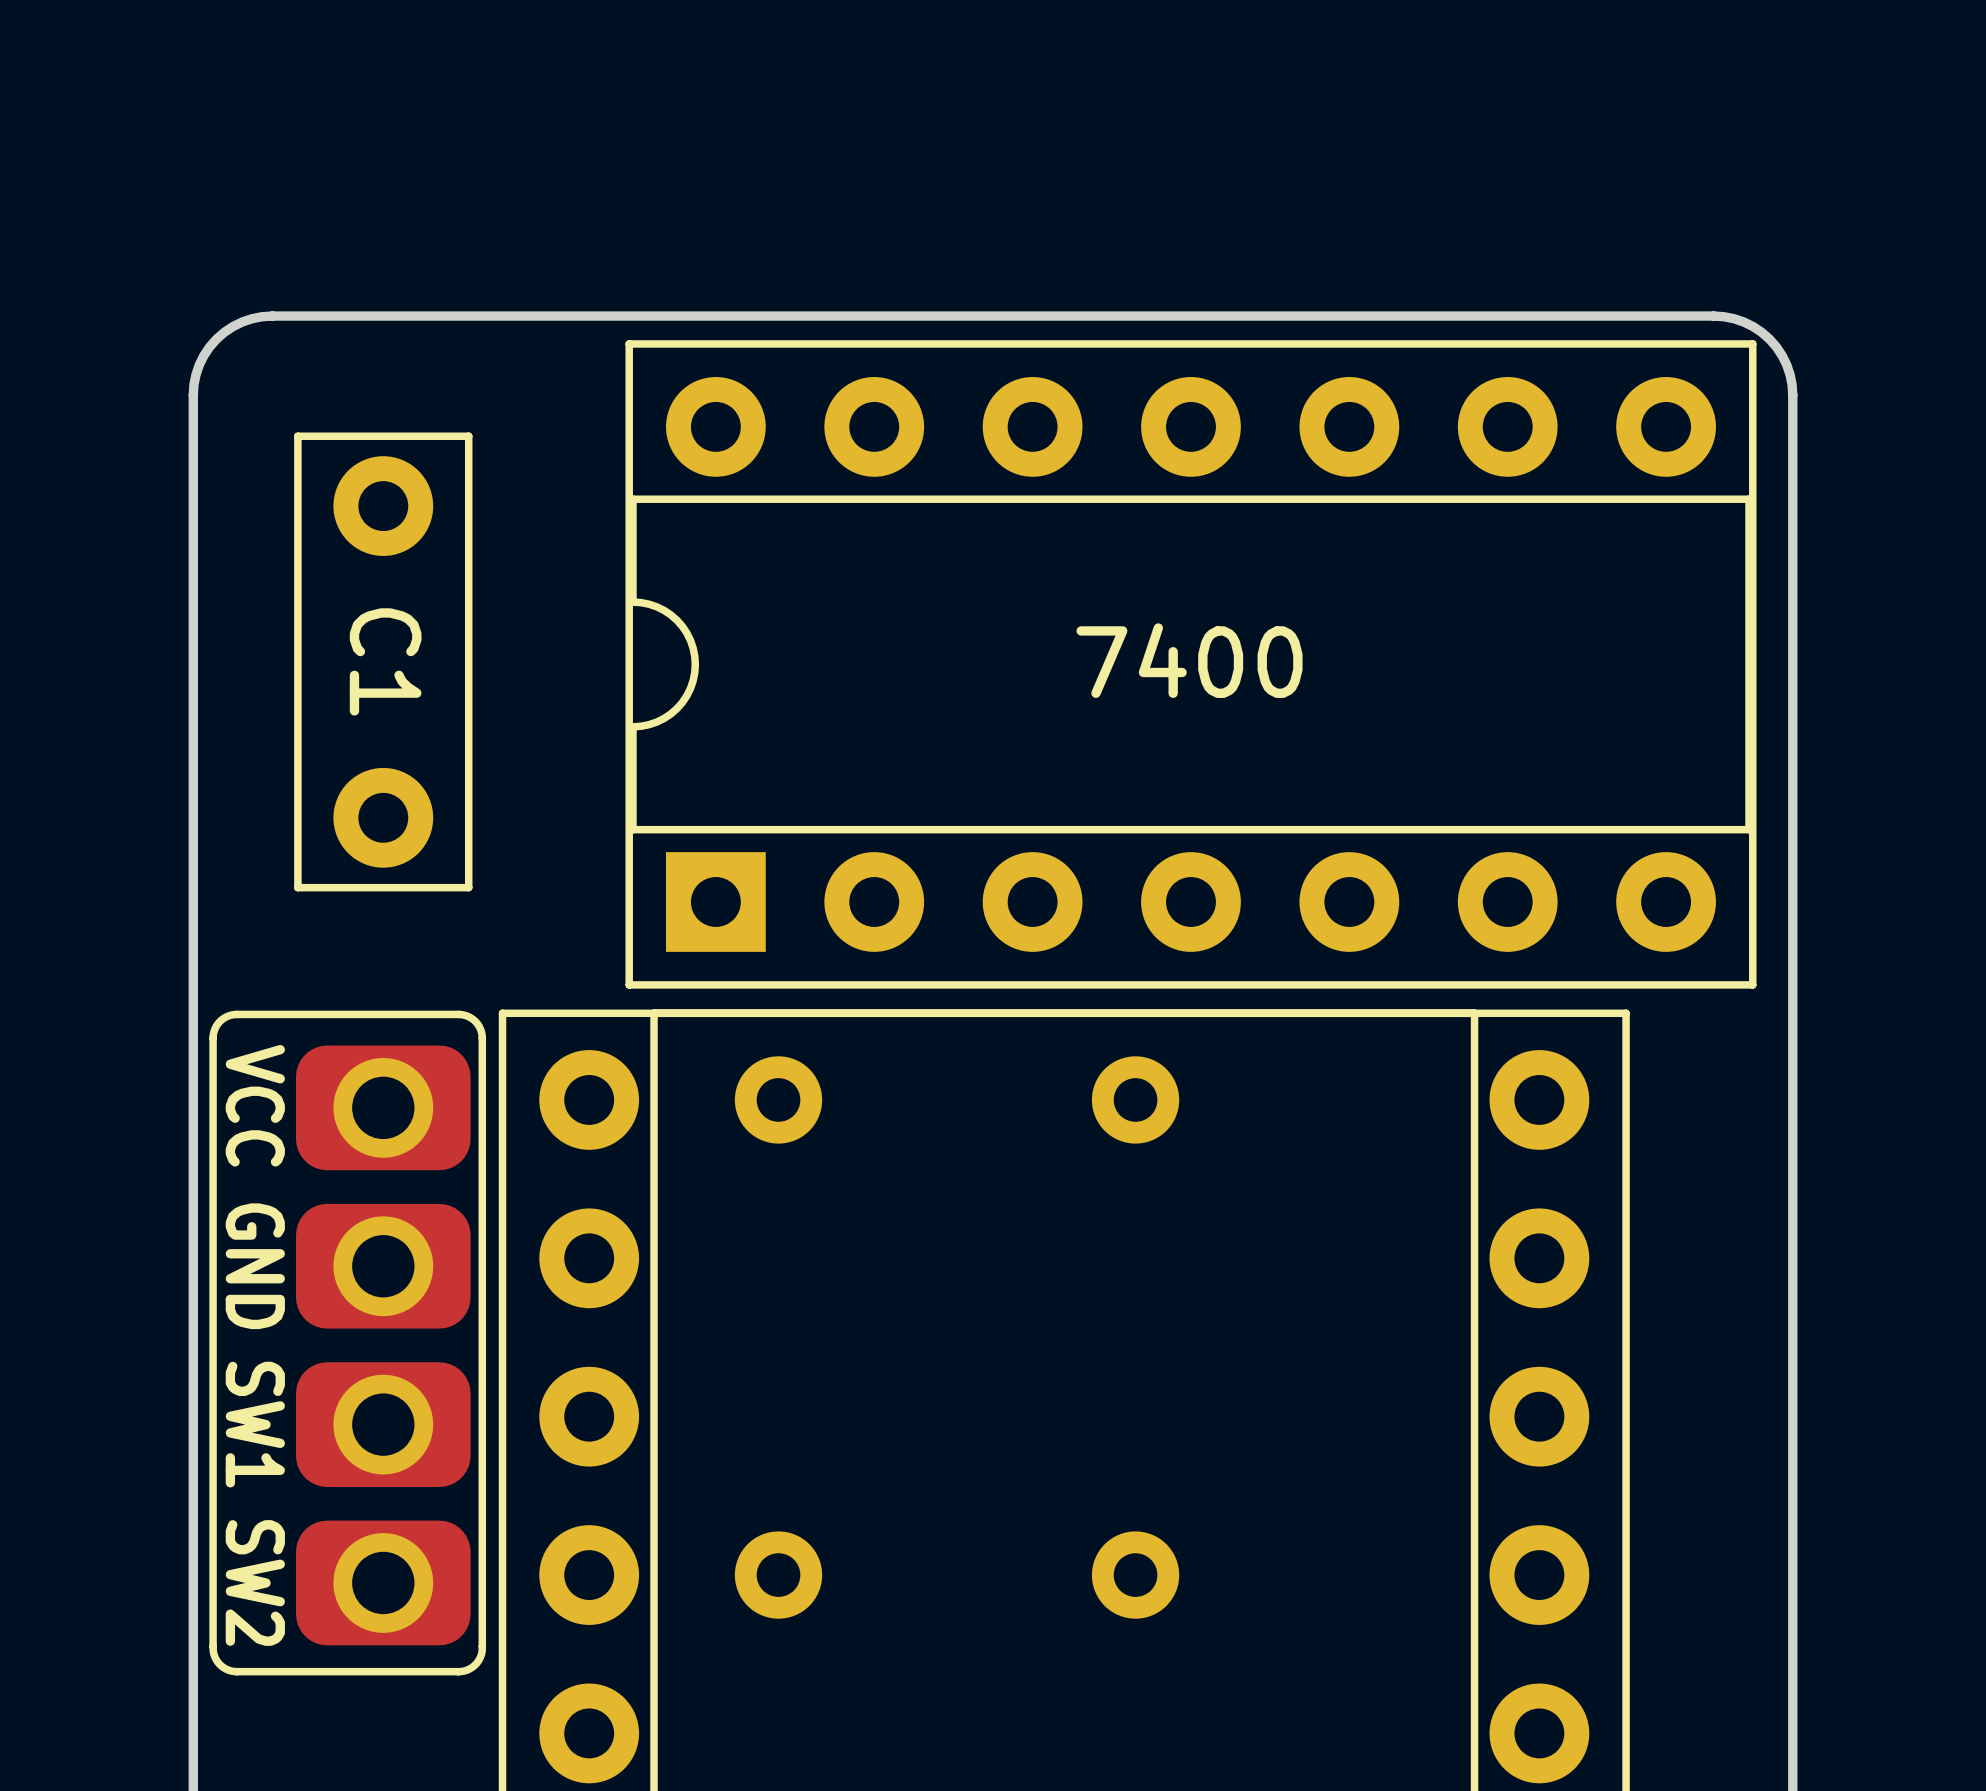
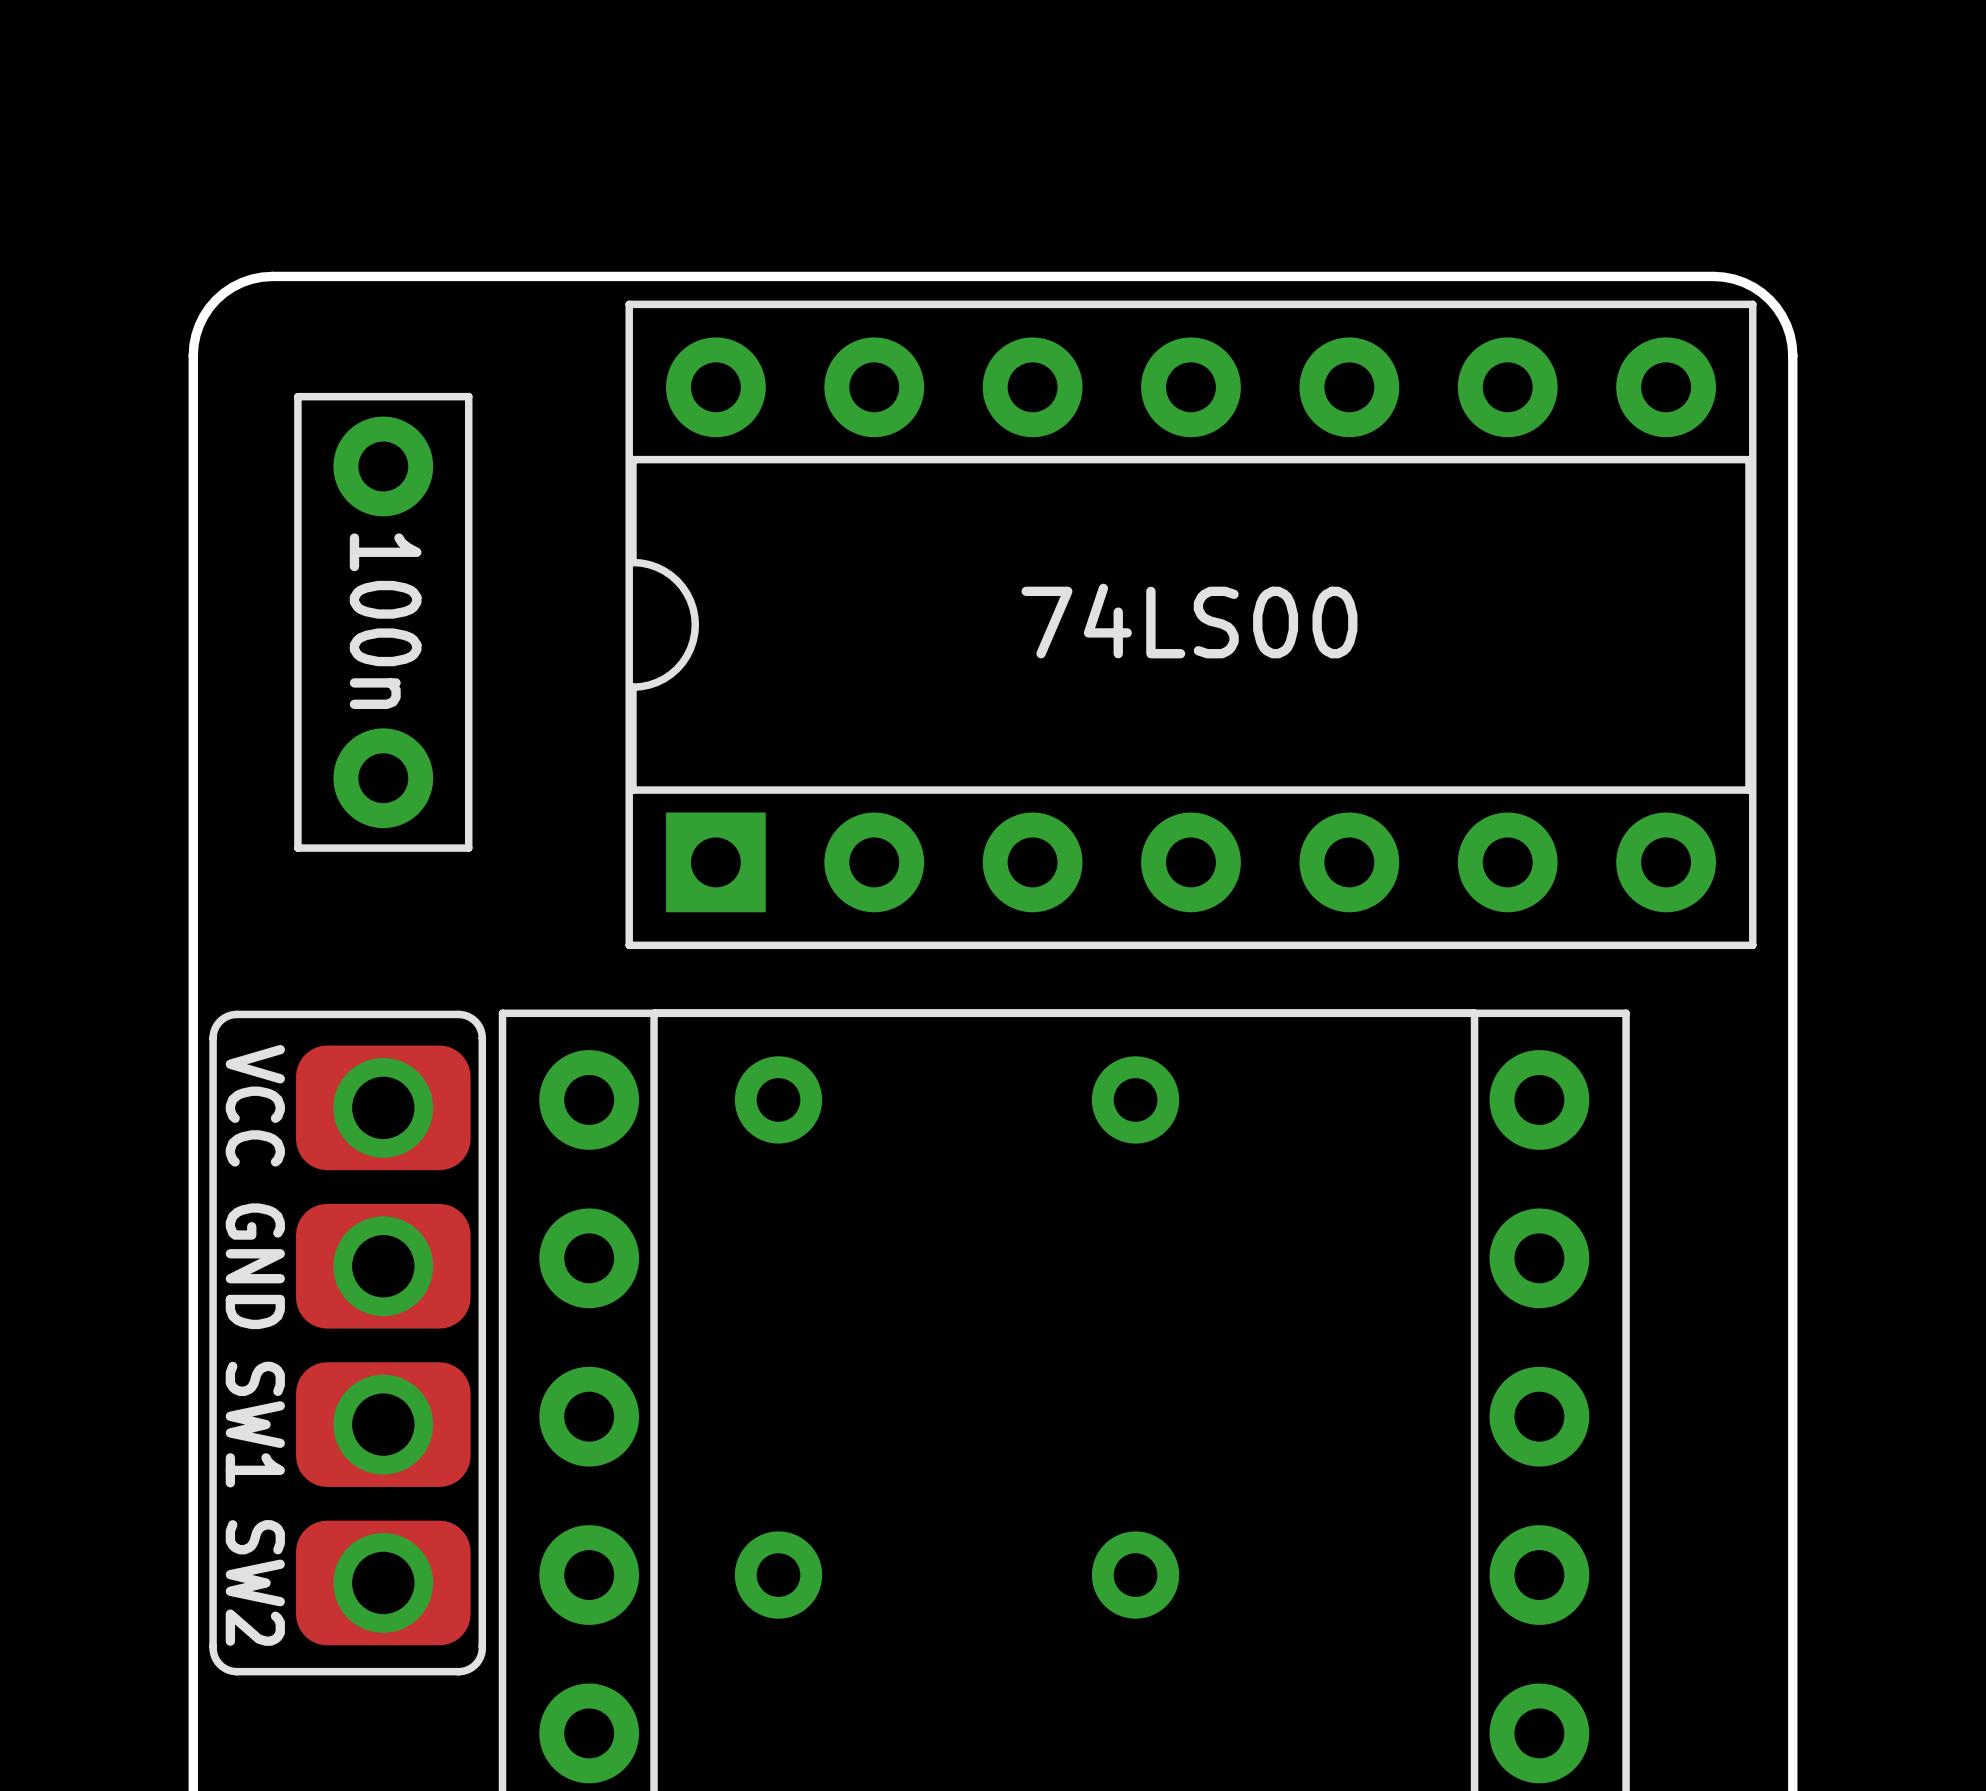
board edge: (193, 395) (199, 364) (216, 339) (242, 322) (272, 316) (1713, 316) (1743, 322) (1769, 339) (1786, 364) (1792, 395) -> (193, 395) (193, 345) (203, 316) (216, 299) (232, 287) (251, 279) (272, 276) (1723, 277) (1753, 287) (1769, 299) (1782, 316) (1792, 345) (1792, 395)
C1 value: none -> 100n (385, 621)
text: 7400 (1189, 660) -> 74LS00 (1189, 621)
C1 position: (383, 661) -> (383, 622)
C1 name: C1 (385, 661) -> none
part position: (1190, 664) -> (1190, 624)

